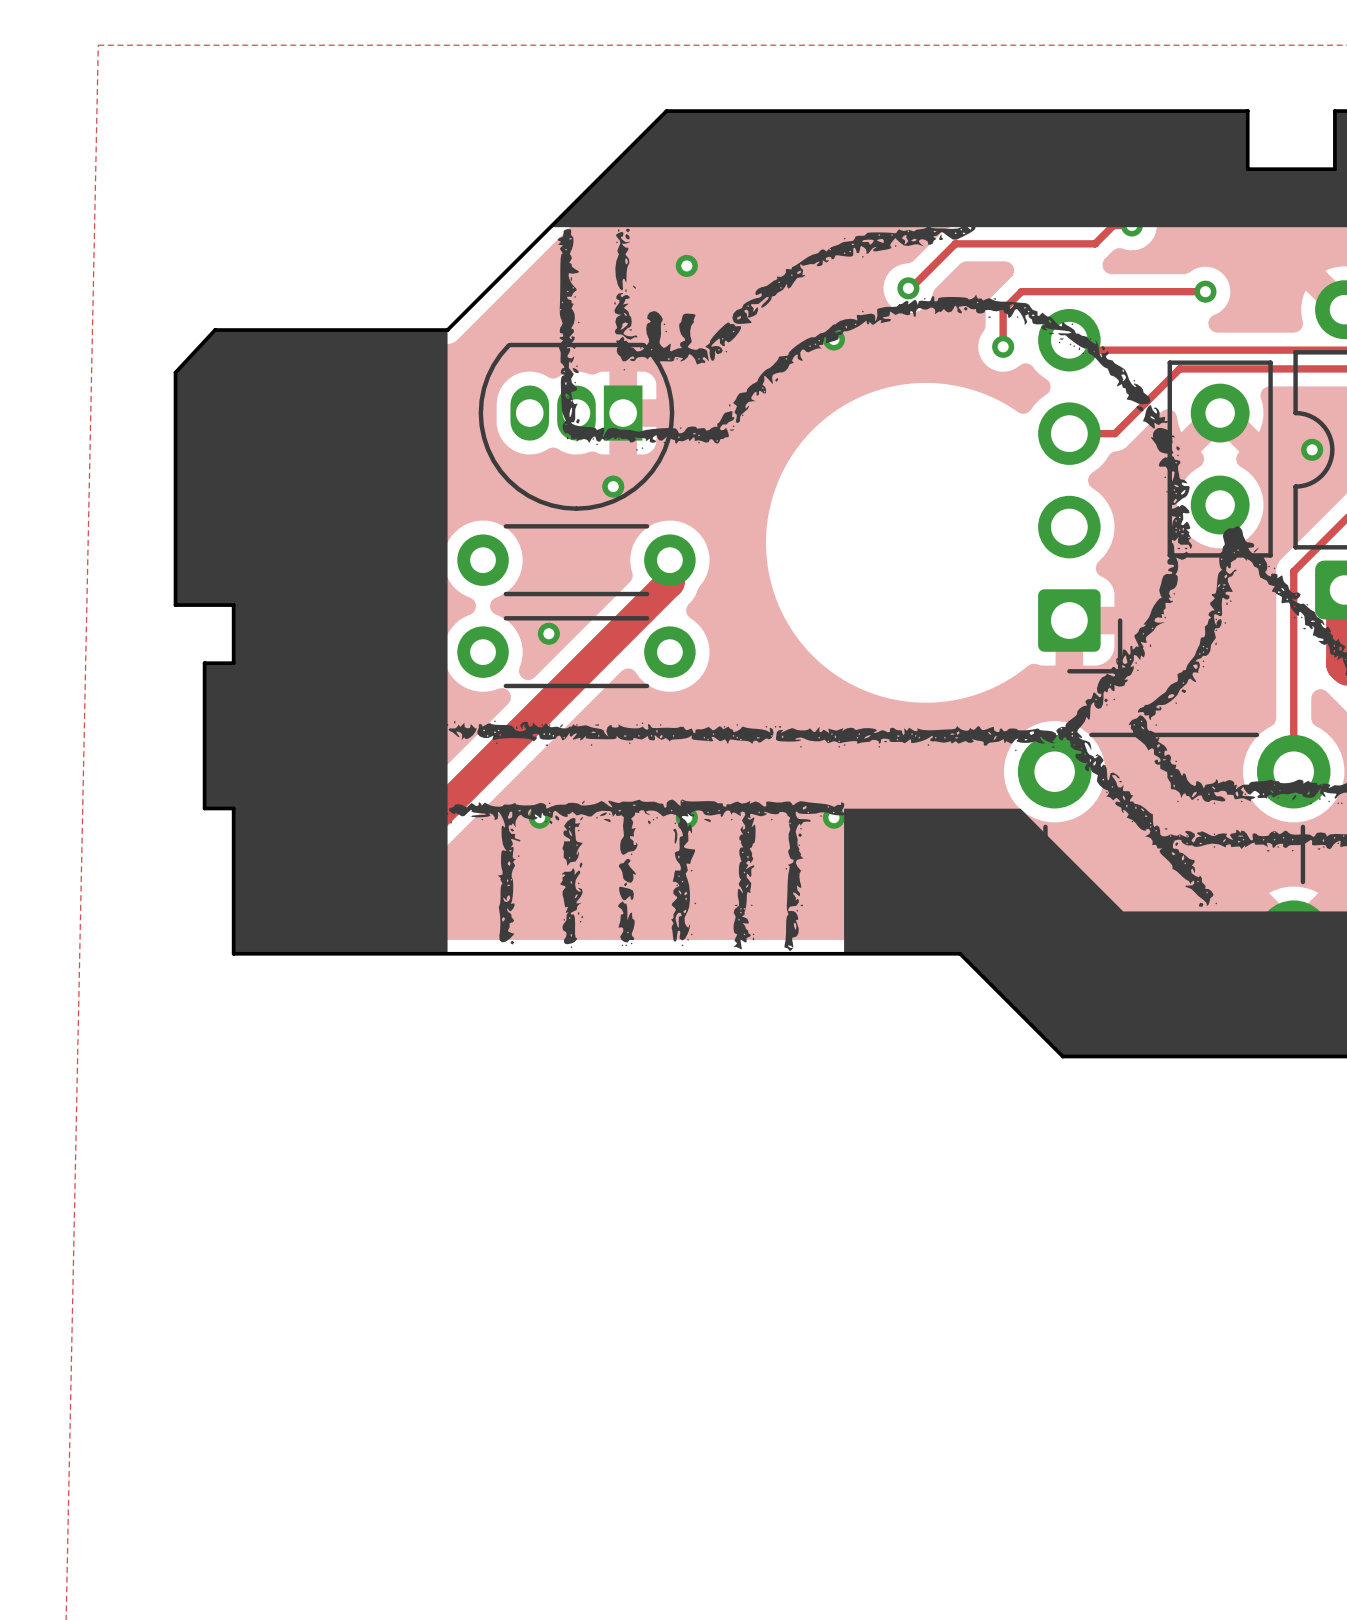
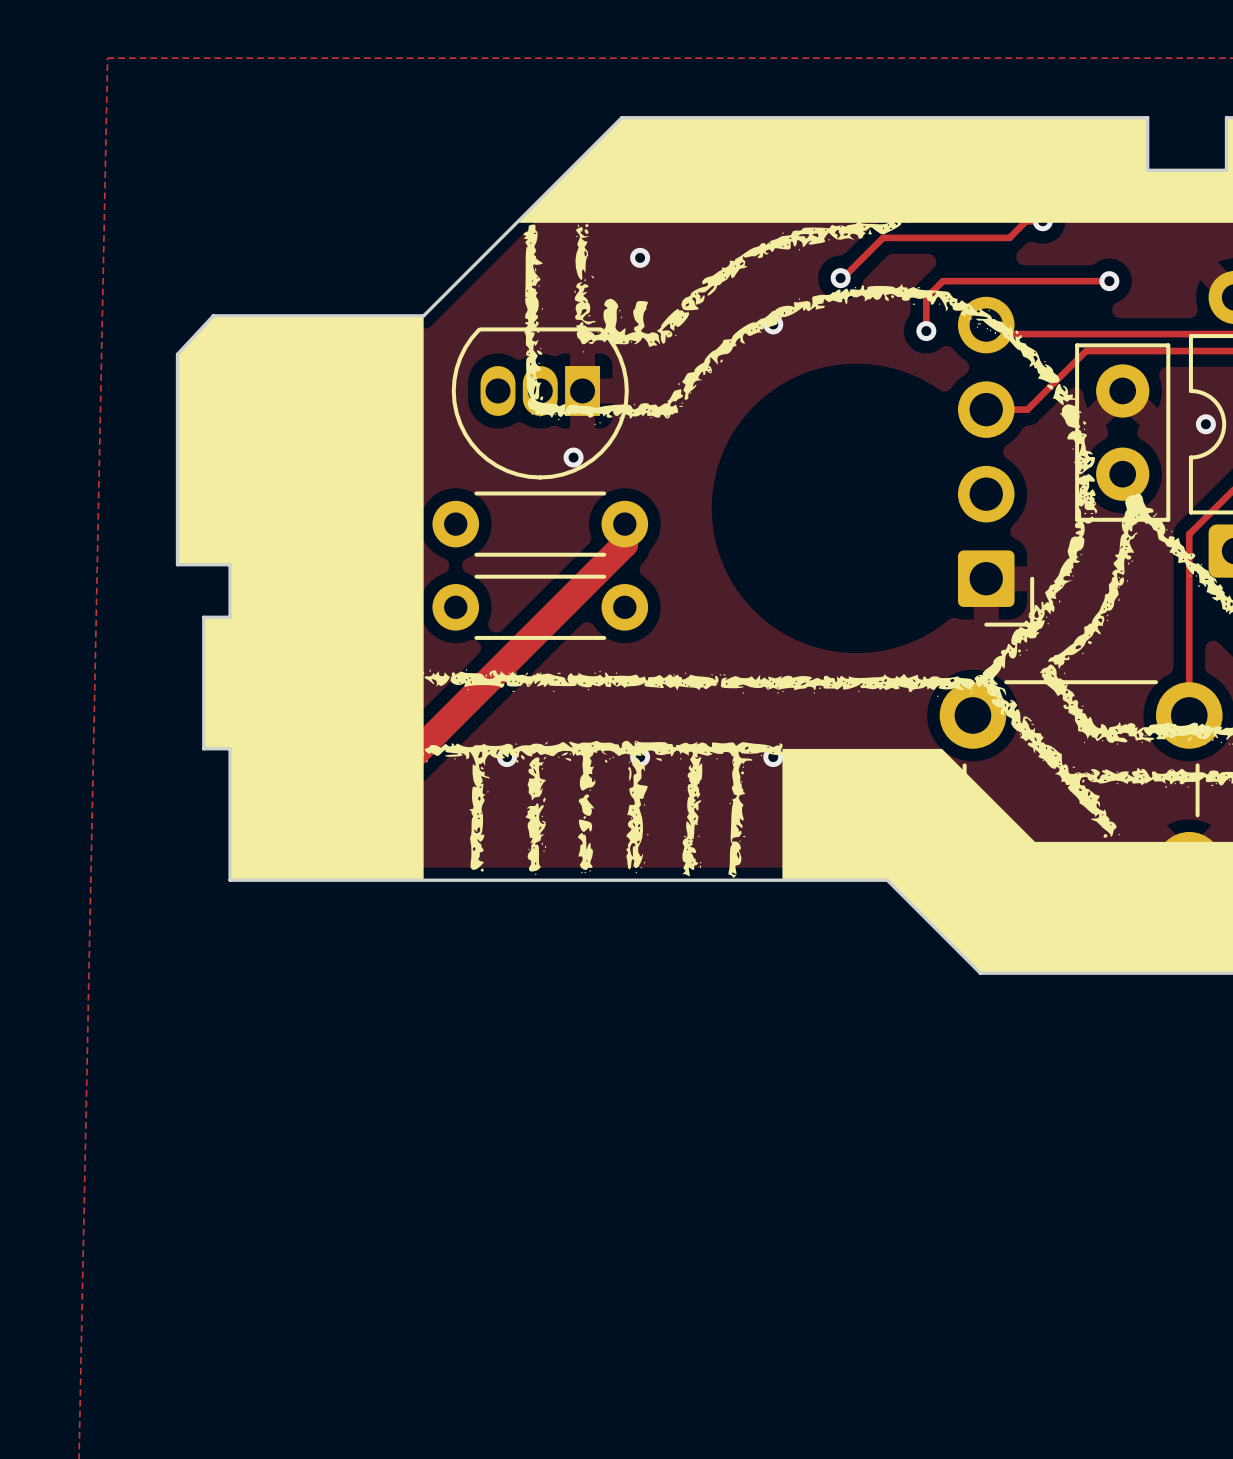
via: (548, 633) -> none

